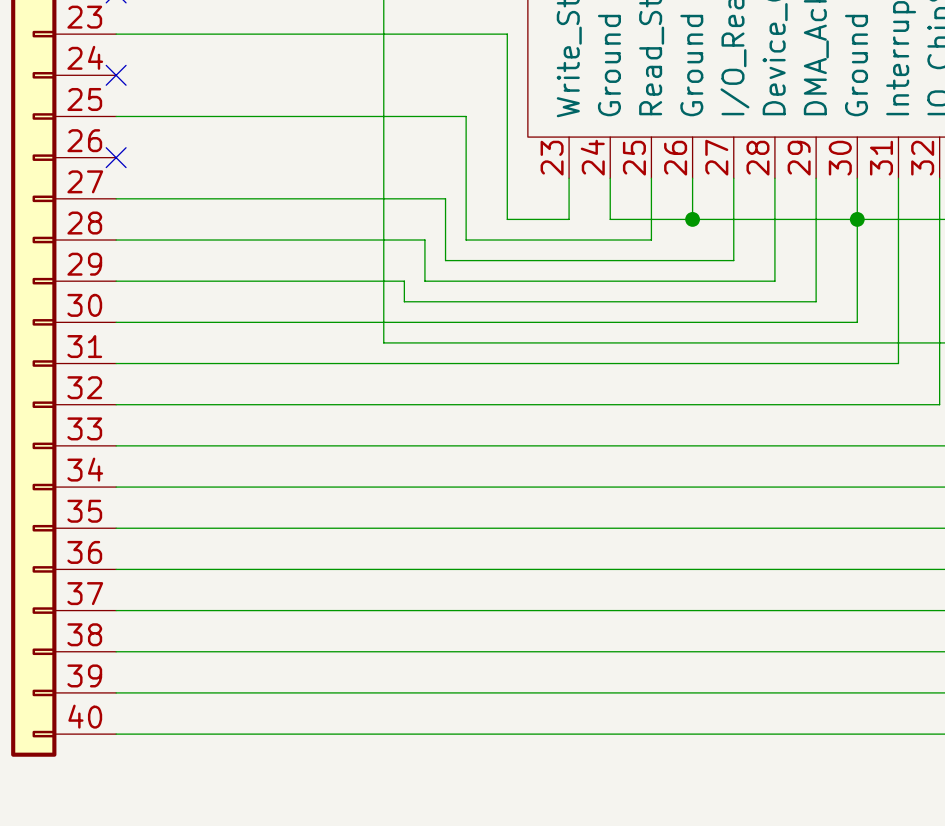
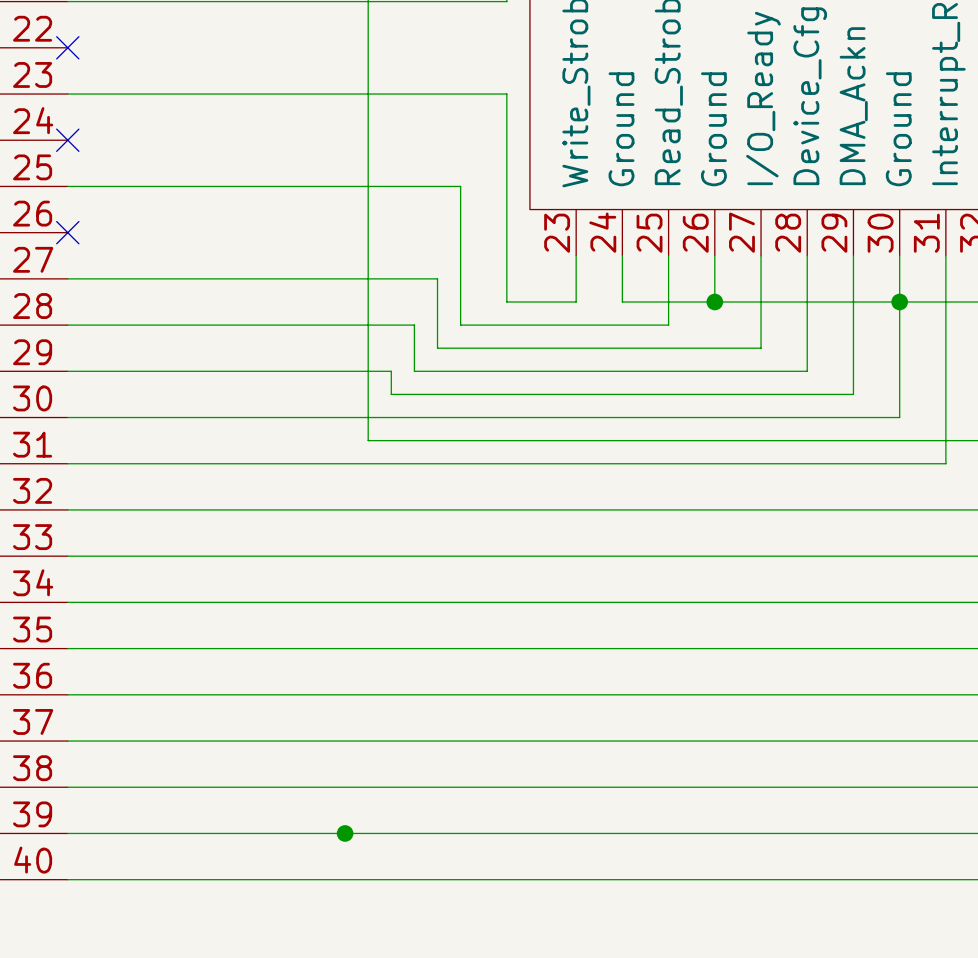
junction: none -> (345, 833)

